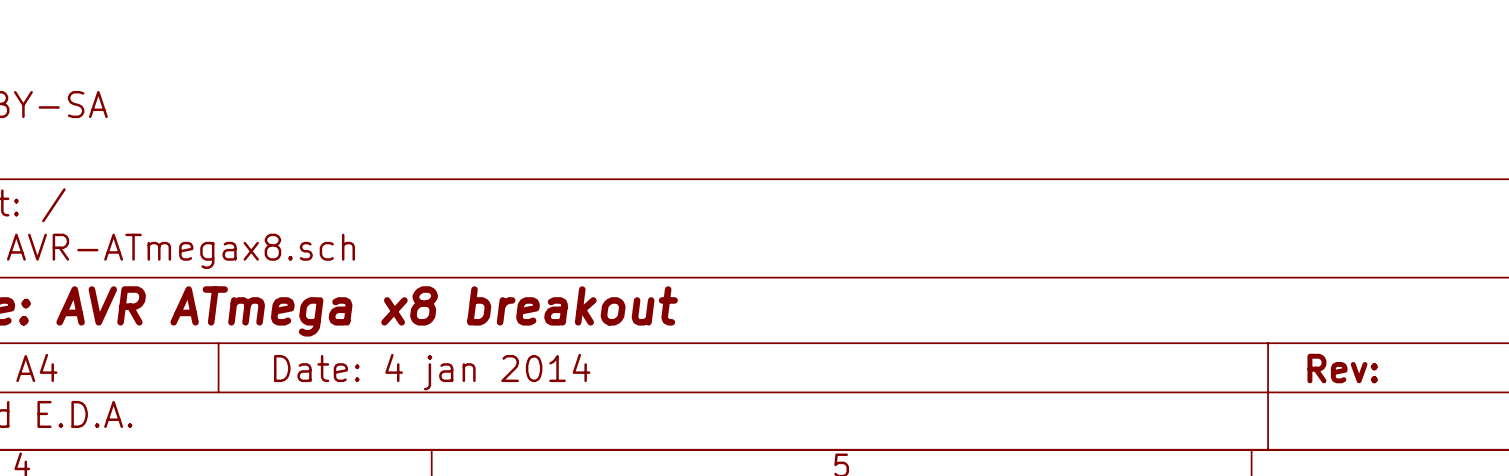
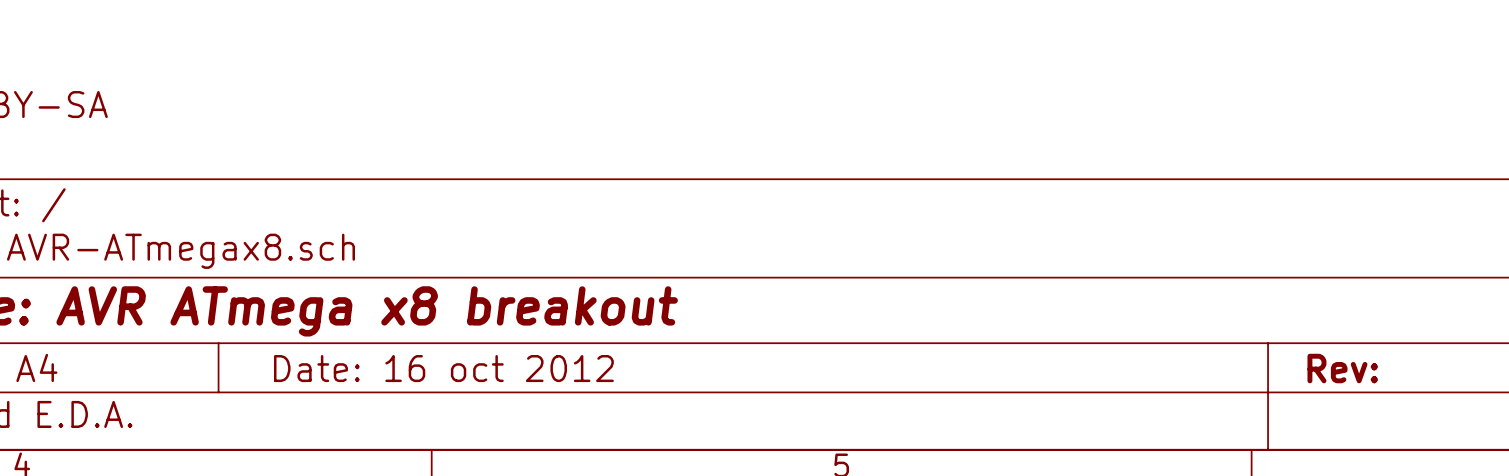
title block: Date: 4 jan 2014 (432, 372) -> Date: 16 oct 2012 (443, 368)

